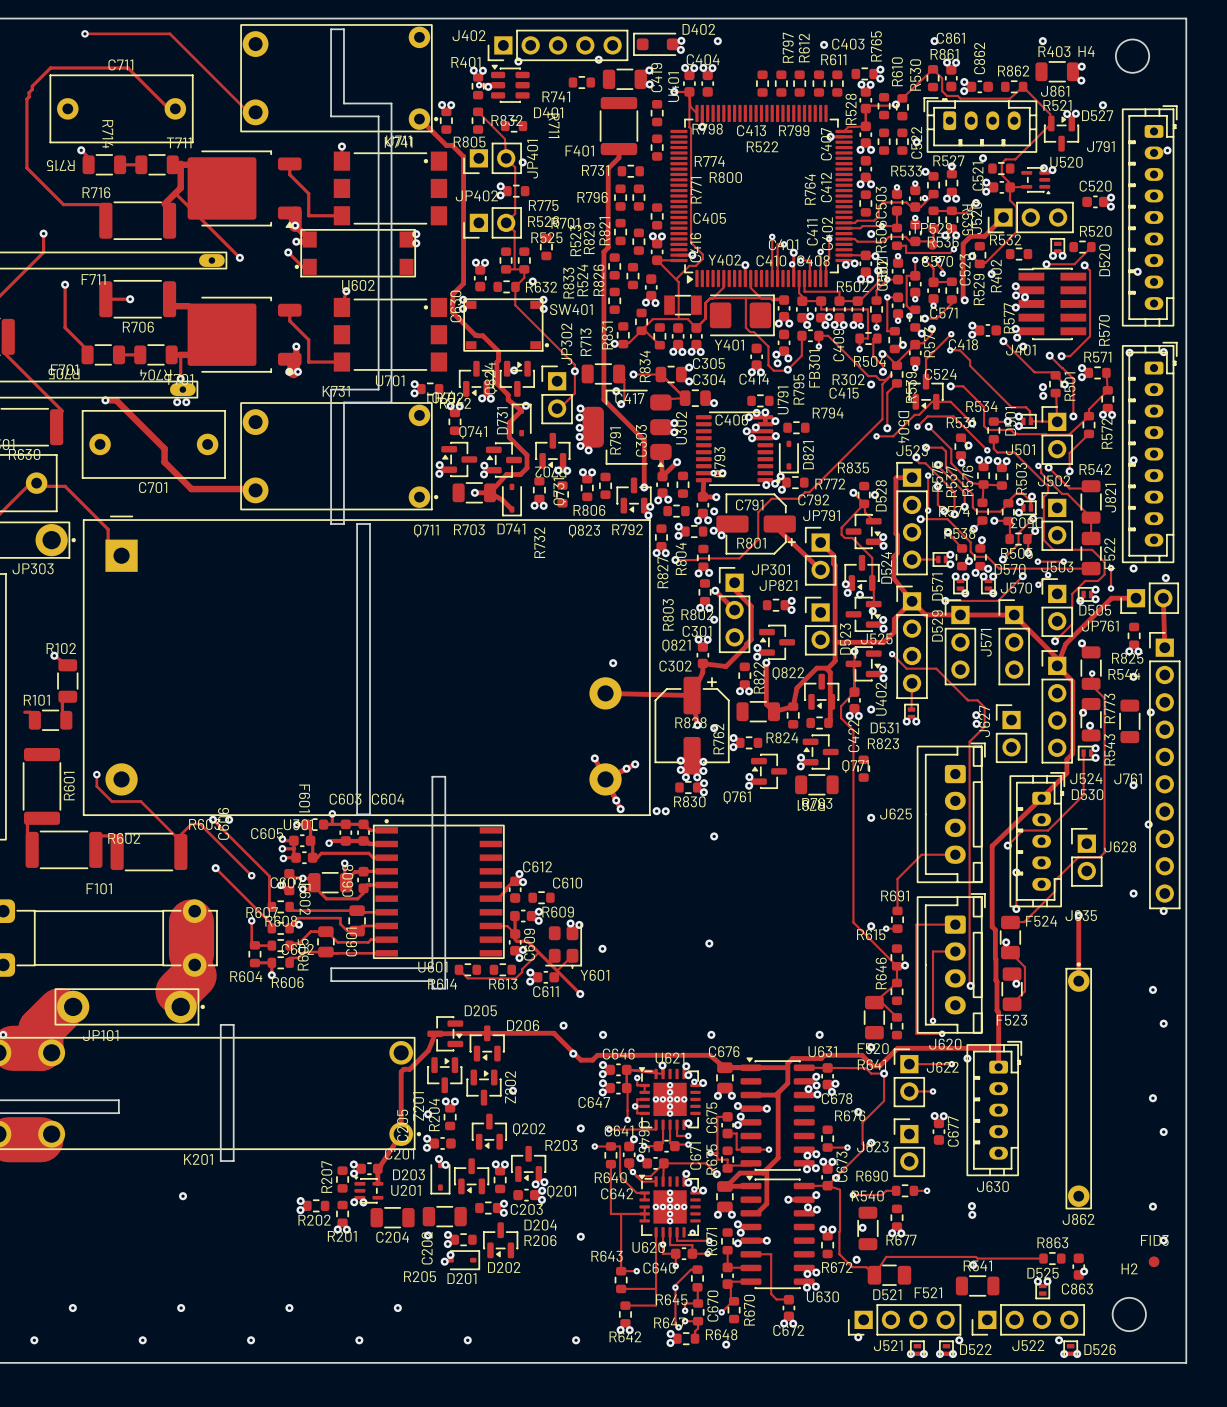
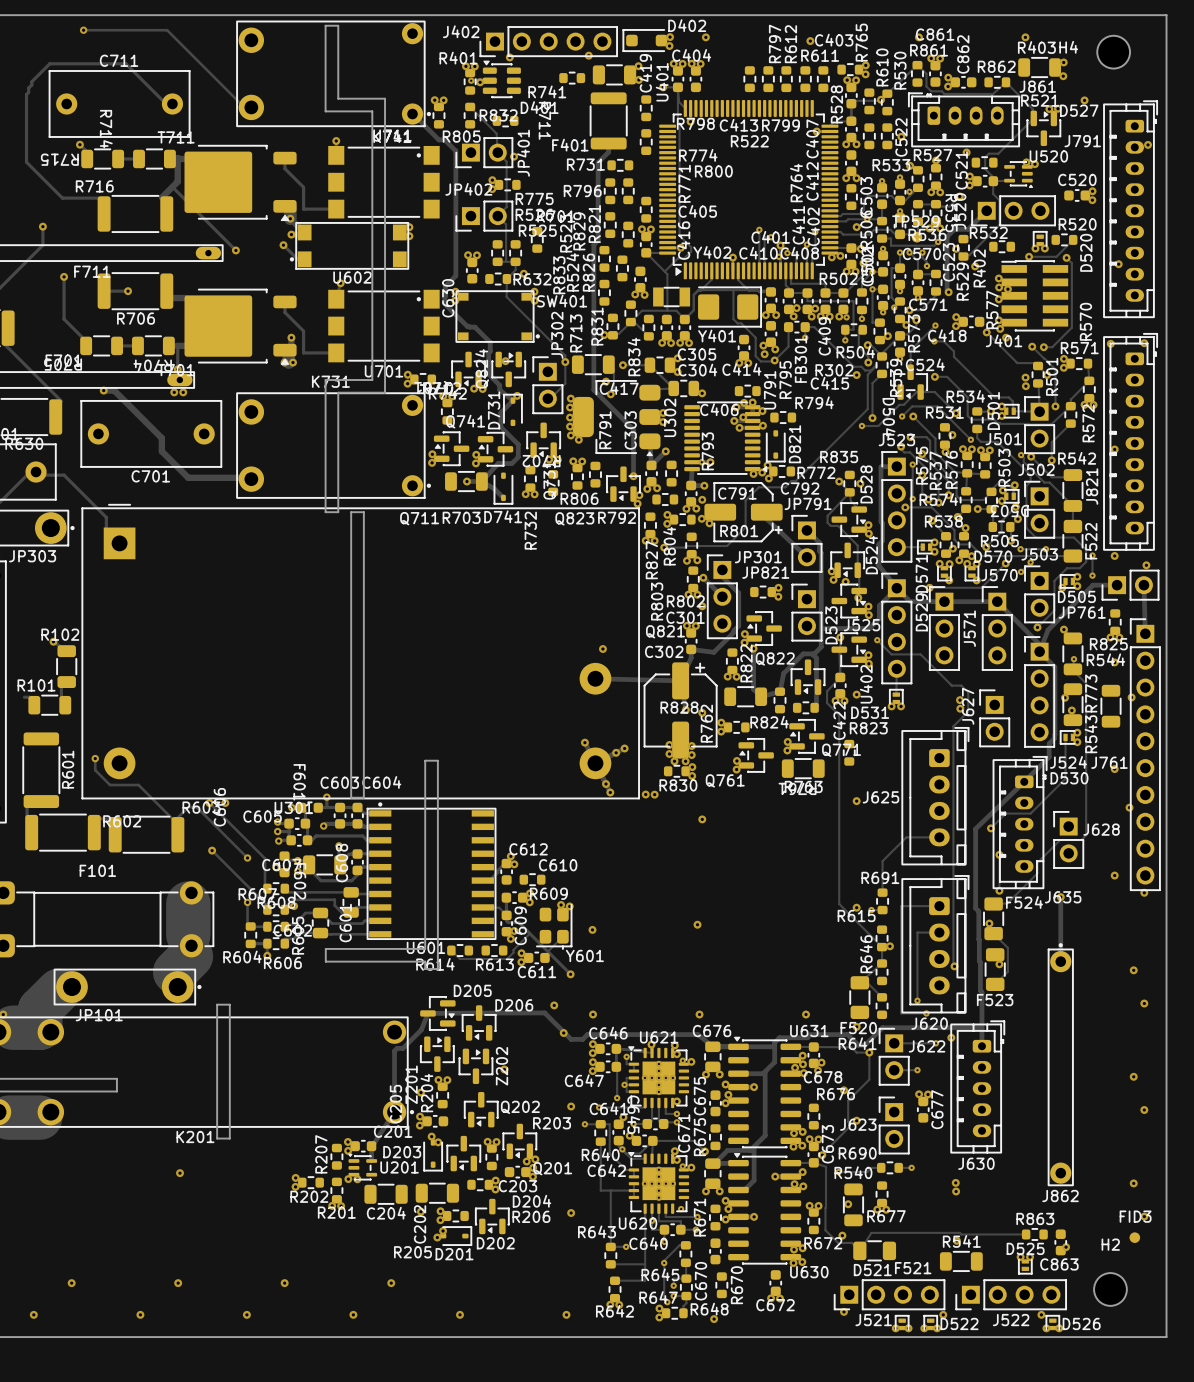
track: (727, 1116) (717, 1116) (717, 1159) (727, 1159) (727, 1165) (750, 1165) -> none
track: (727, 1133) (736, 1133) (736, 1149) (769, 1149) -> none
track: (827, 1147) (847, 1147) -> none
via: (847, 1147) -> none
via: (769, 1149) -> none
track: (710, 1153) (717, 1153) -> none
via: (710, 1153) -> none
track: (727, 1250) (727, 1267) (750, 1267) -> none
track: (750, 1254) (771, 1254) (771, 1294) (776, 1299) (788, 1299) -> none
track: (750, 1281) (730, 1281) (730, 1303) (721, 1312) -> none
via: (721, 1312) -> none

